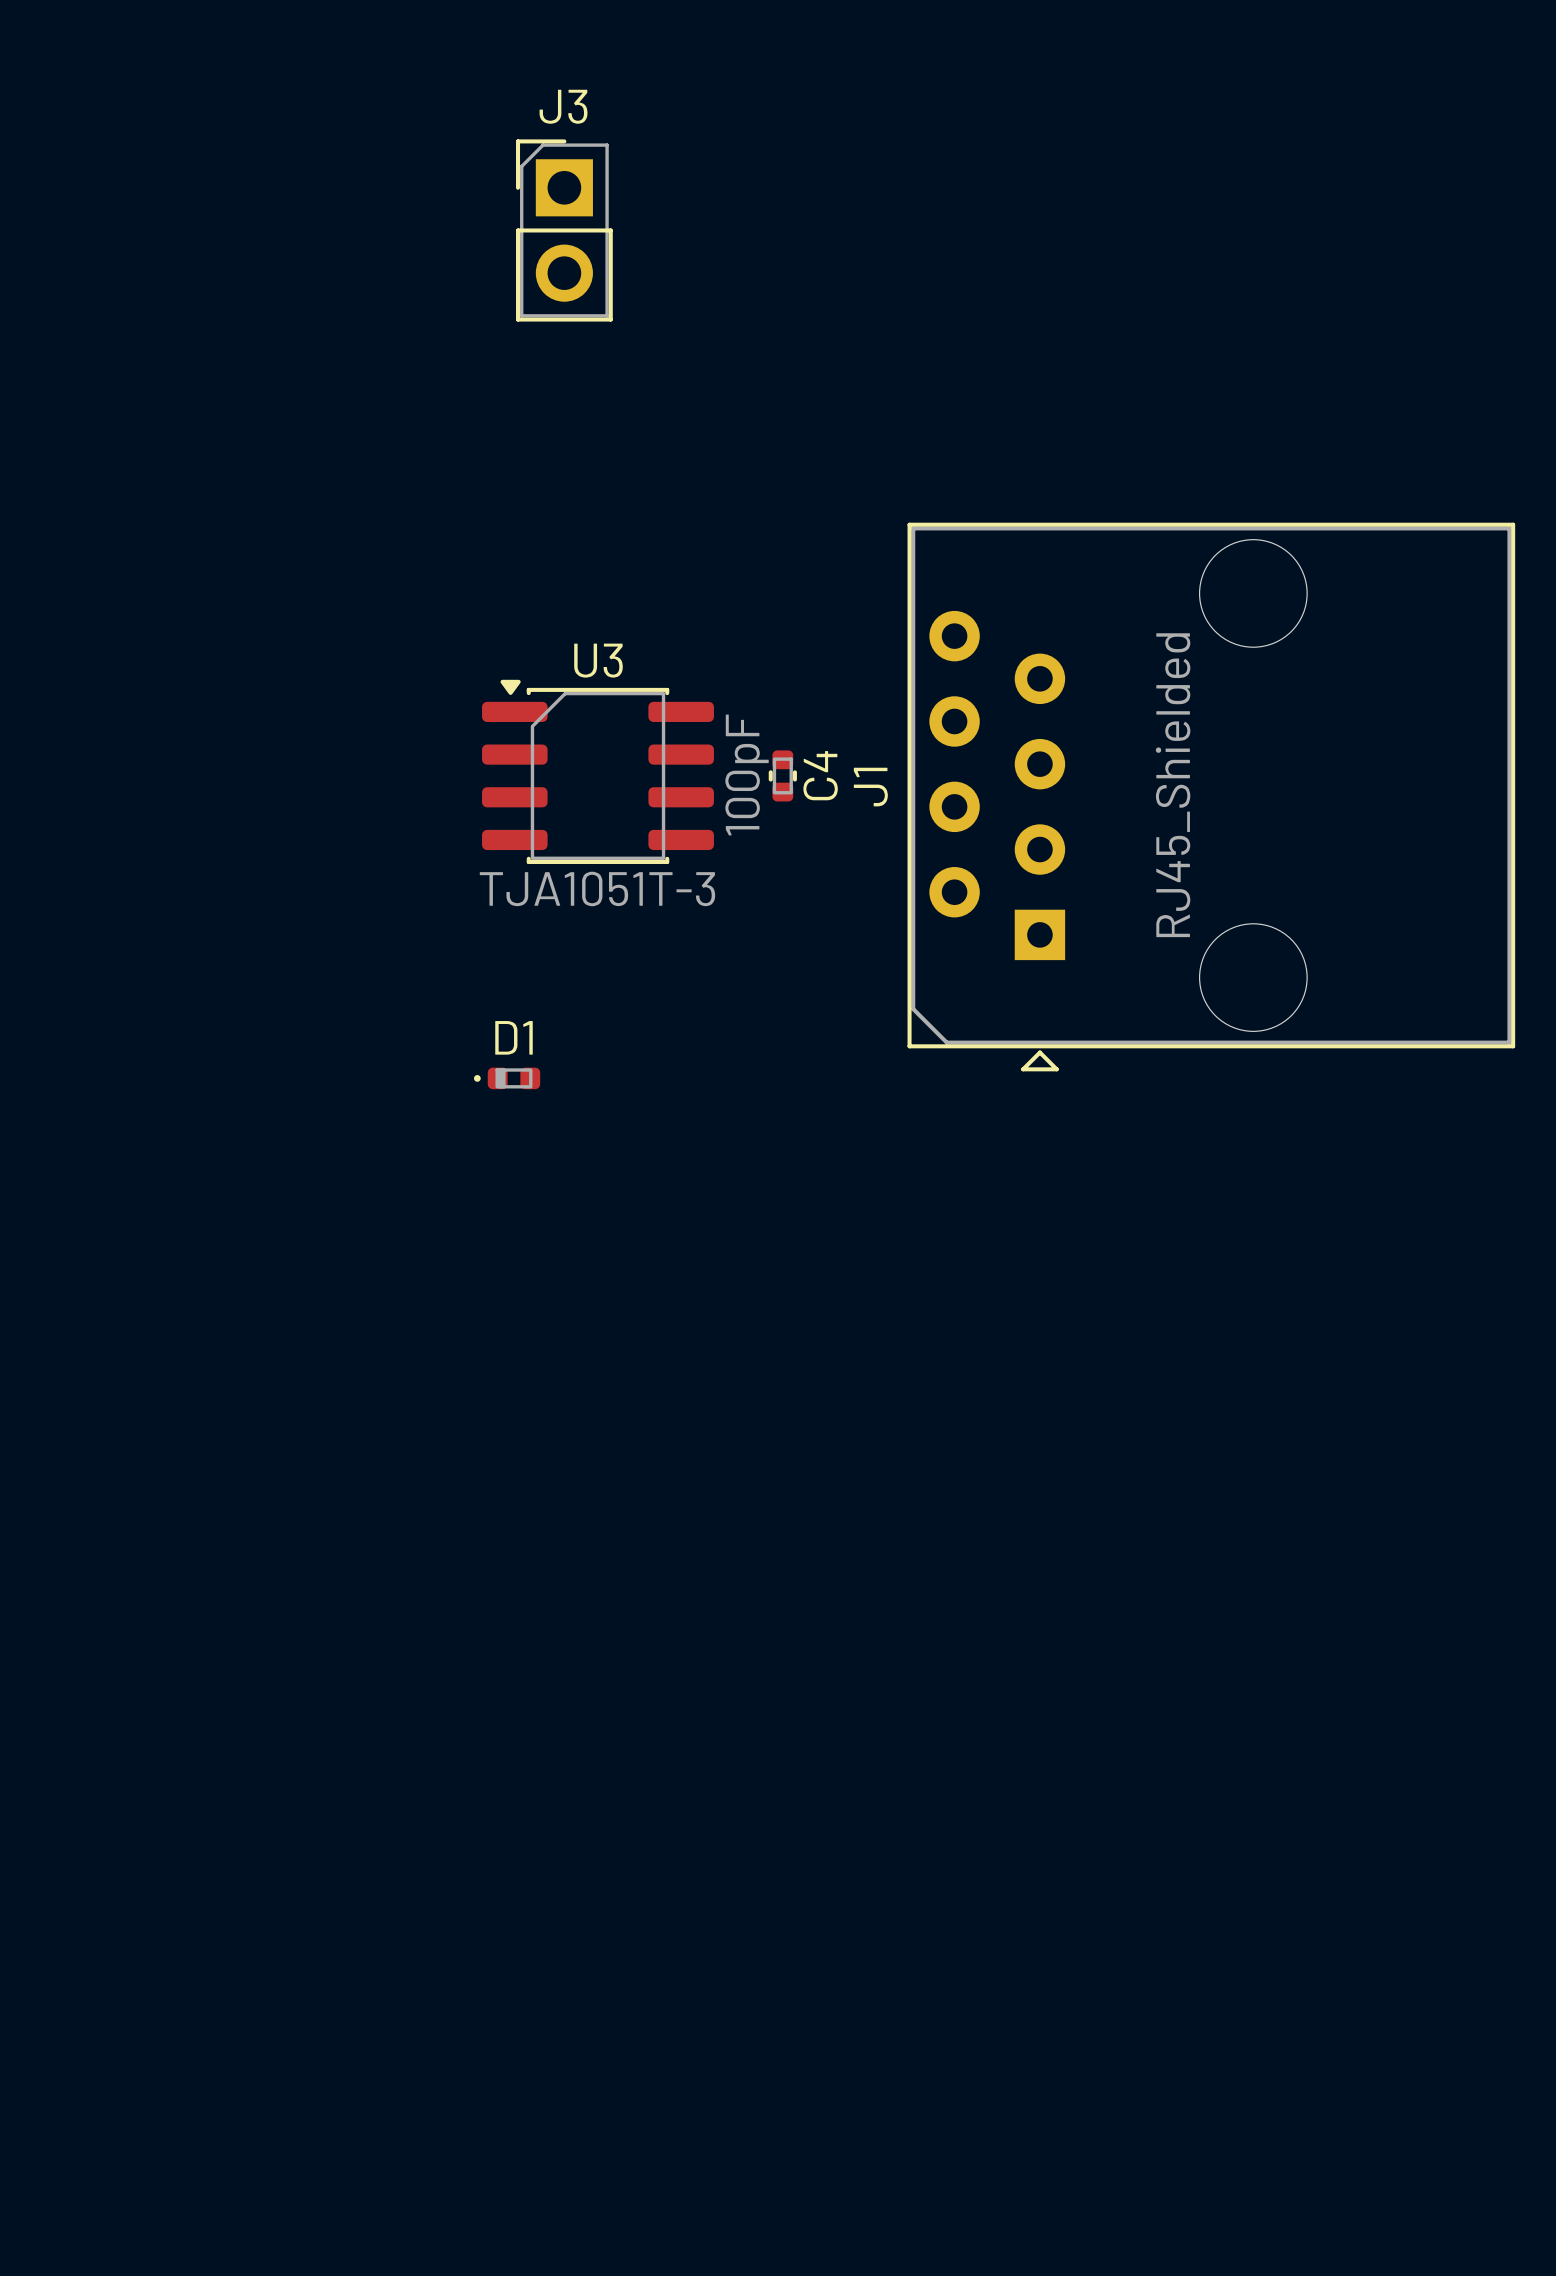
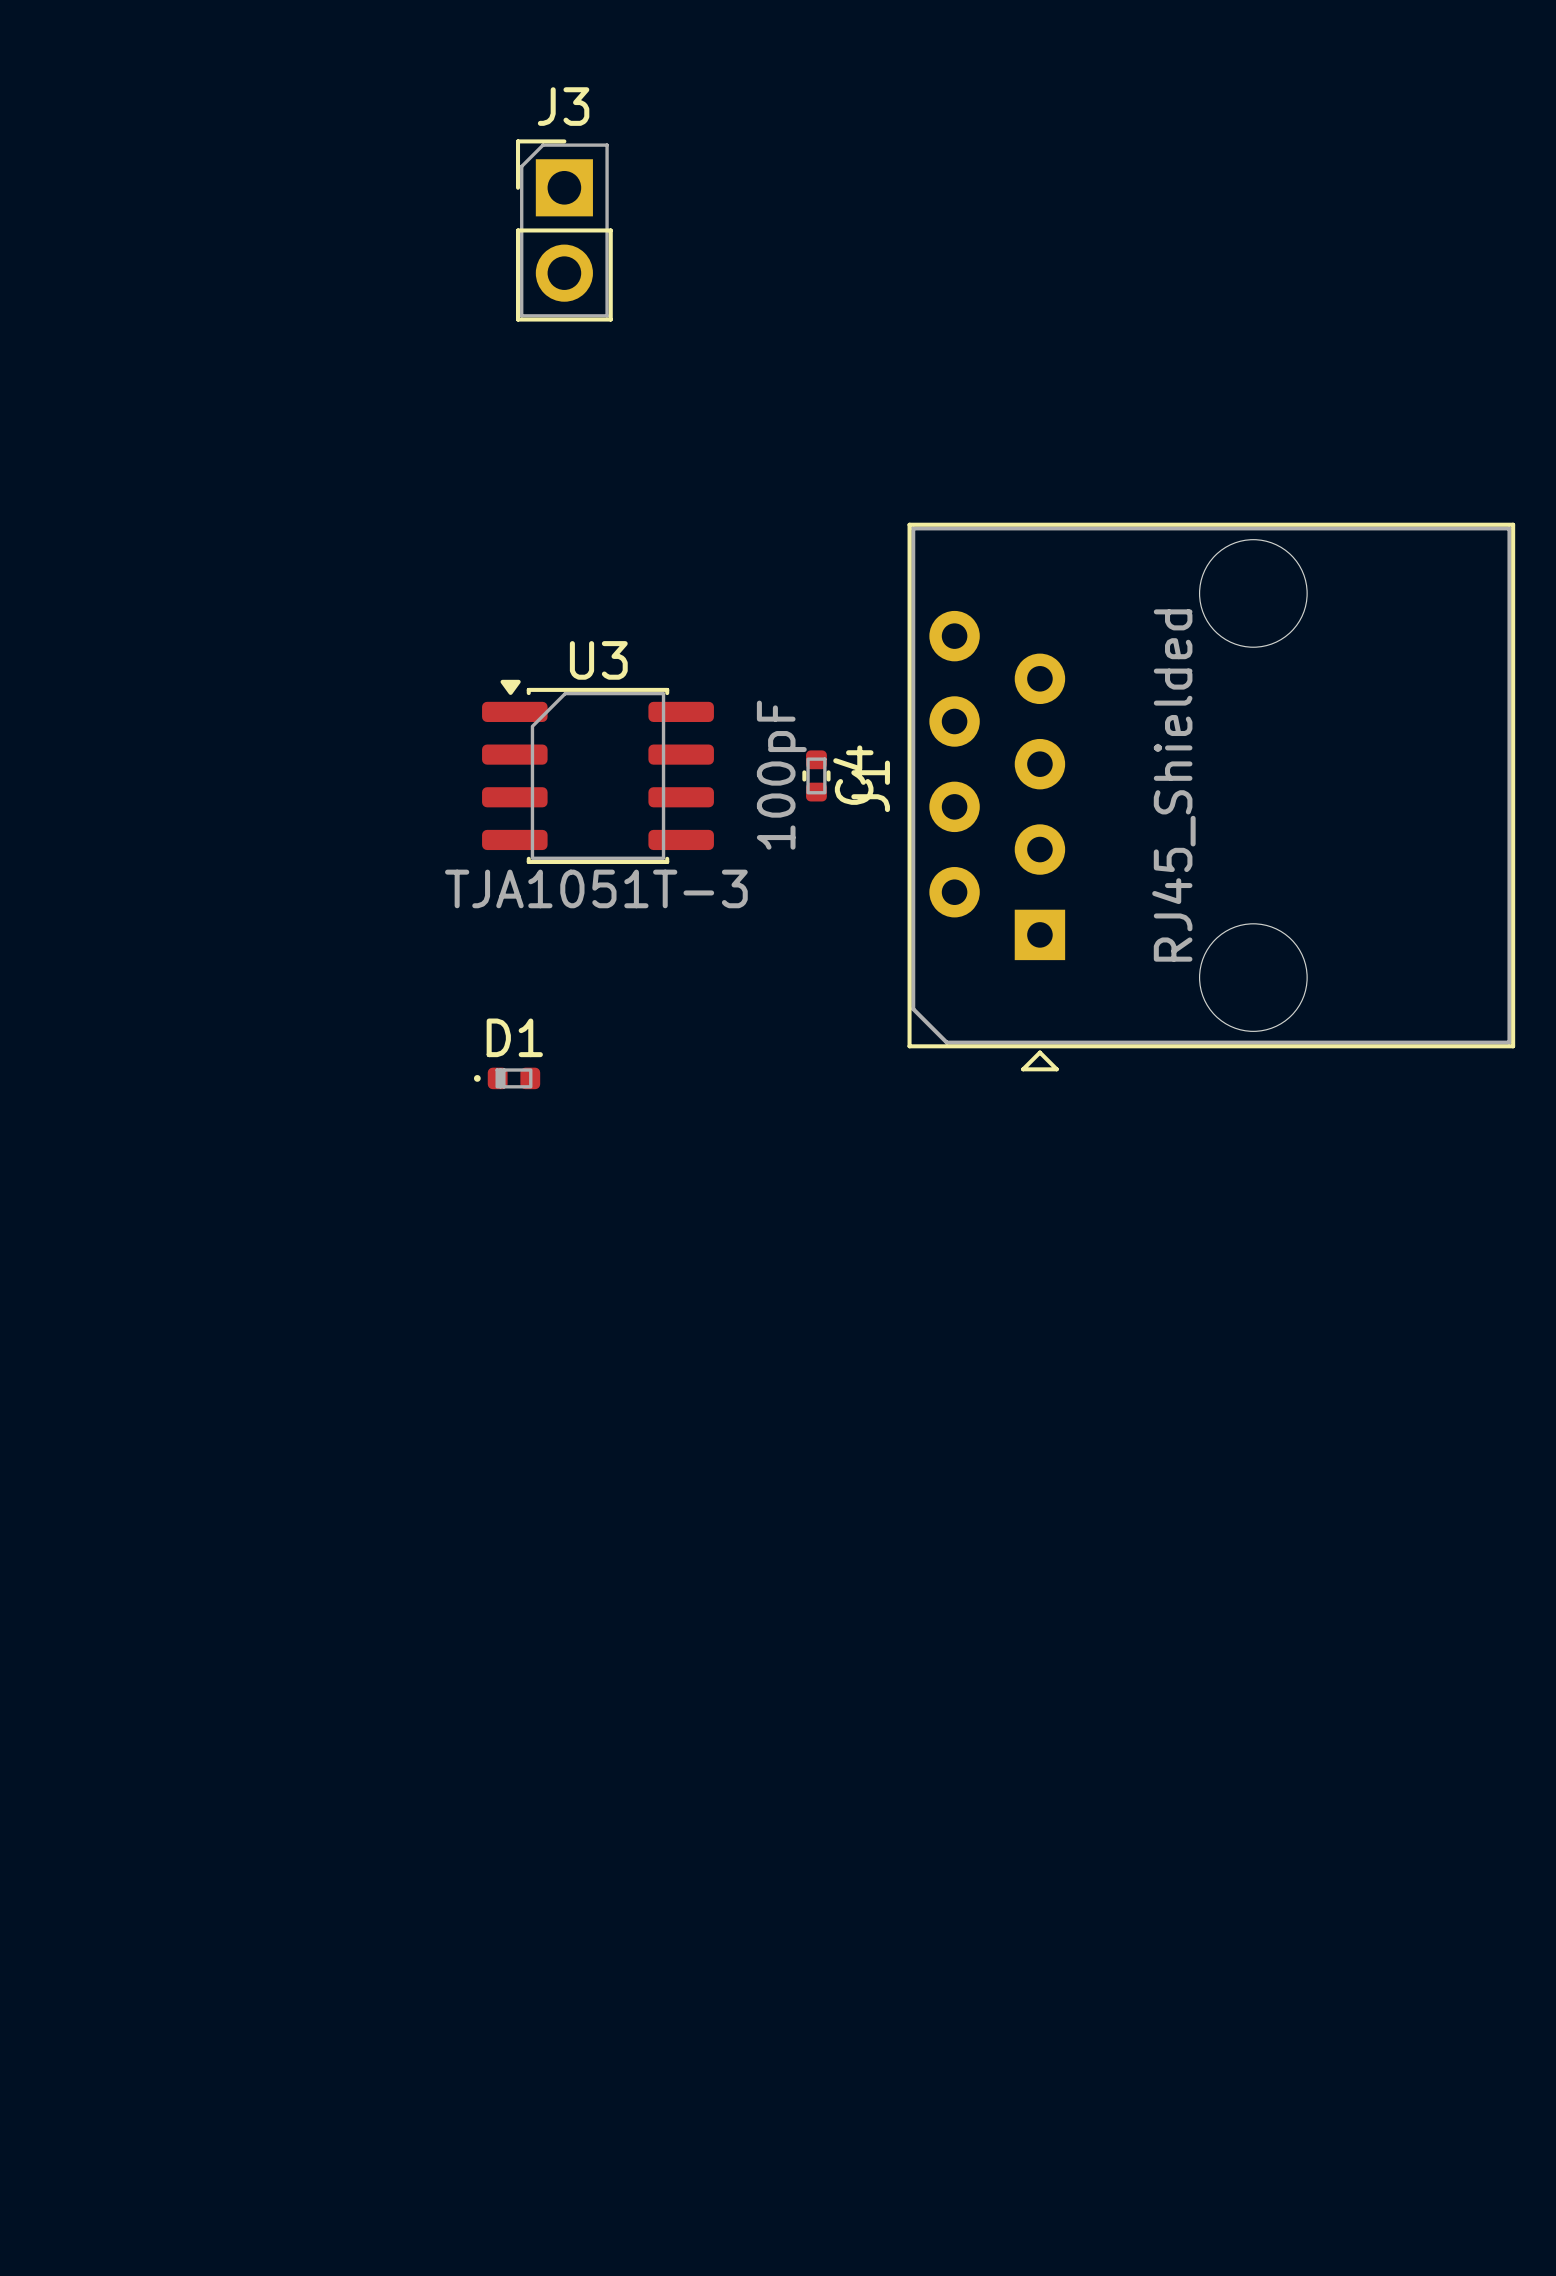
C4 position: (782, 775) -> (816, 775)

